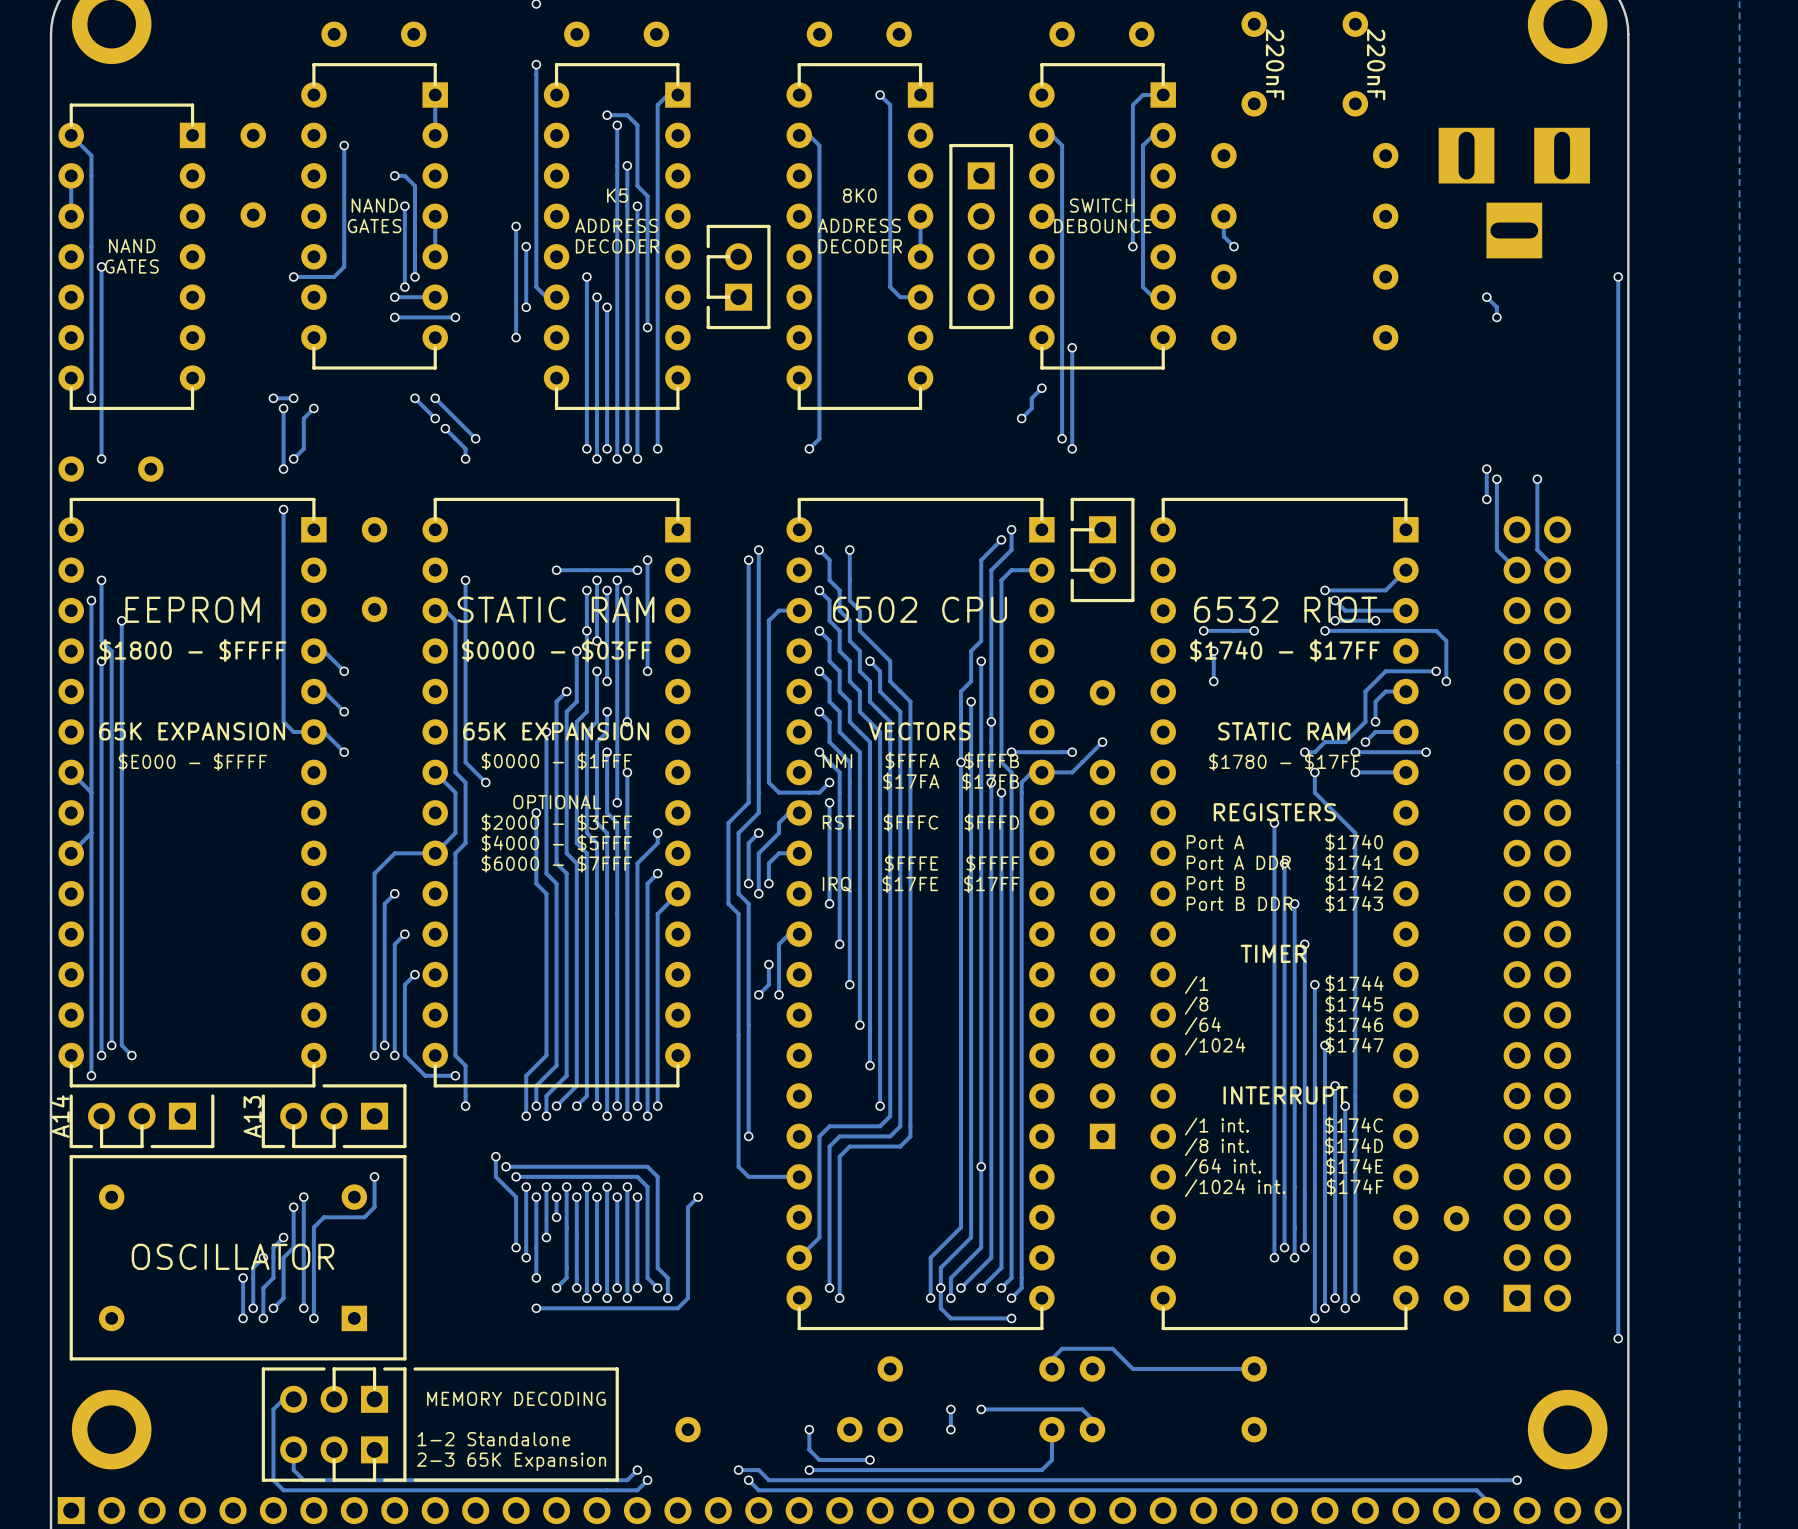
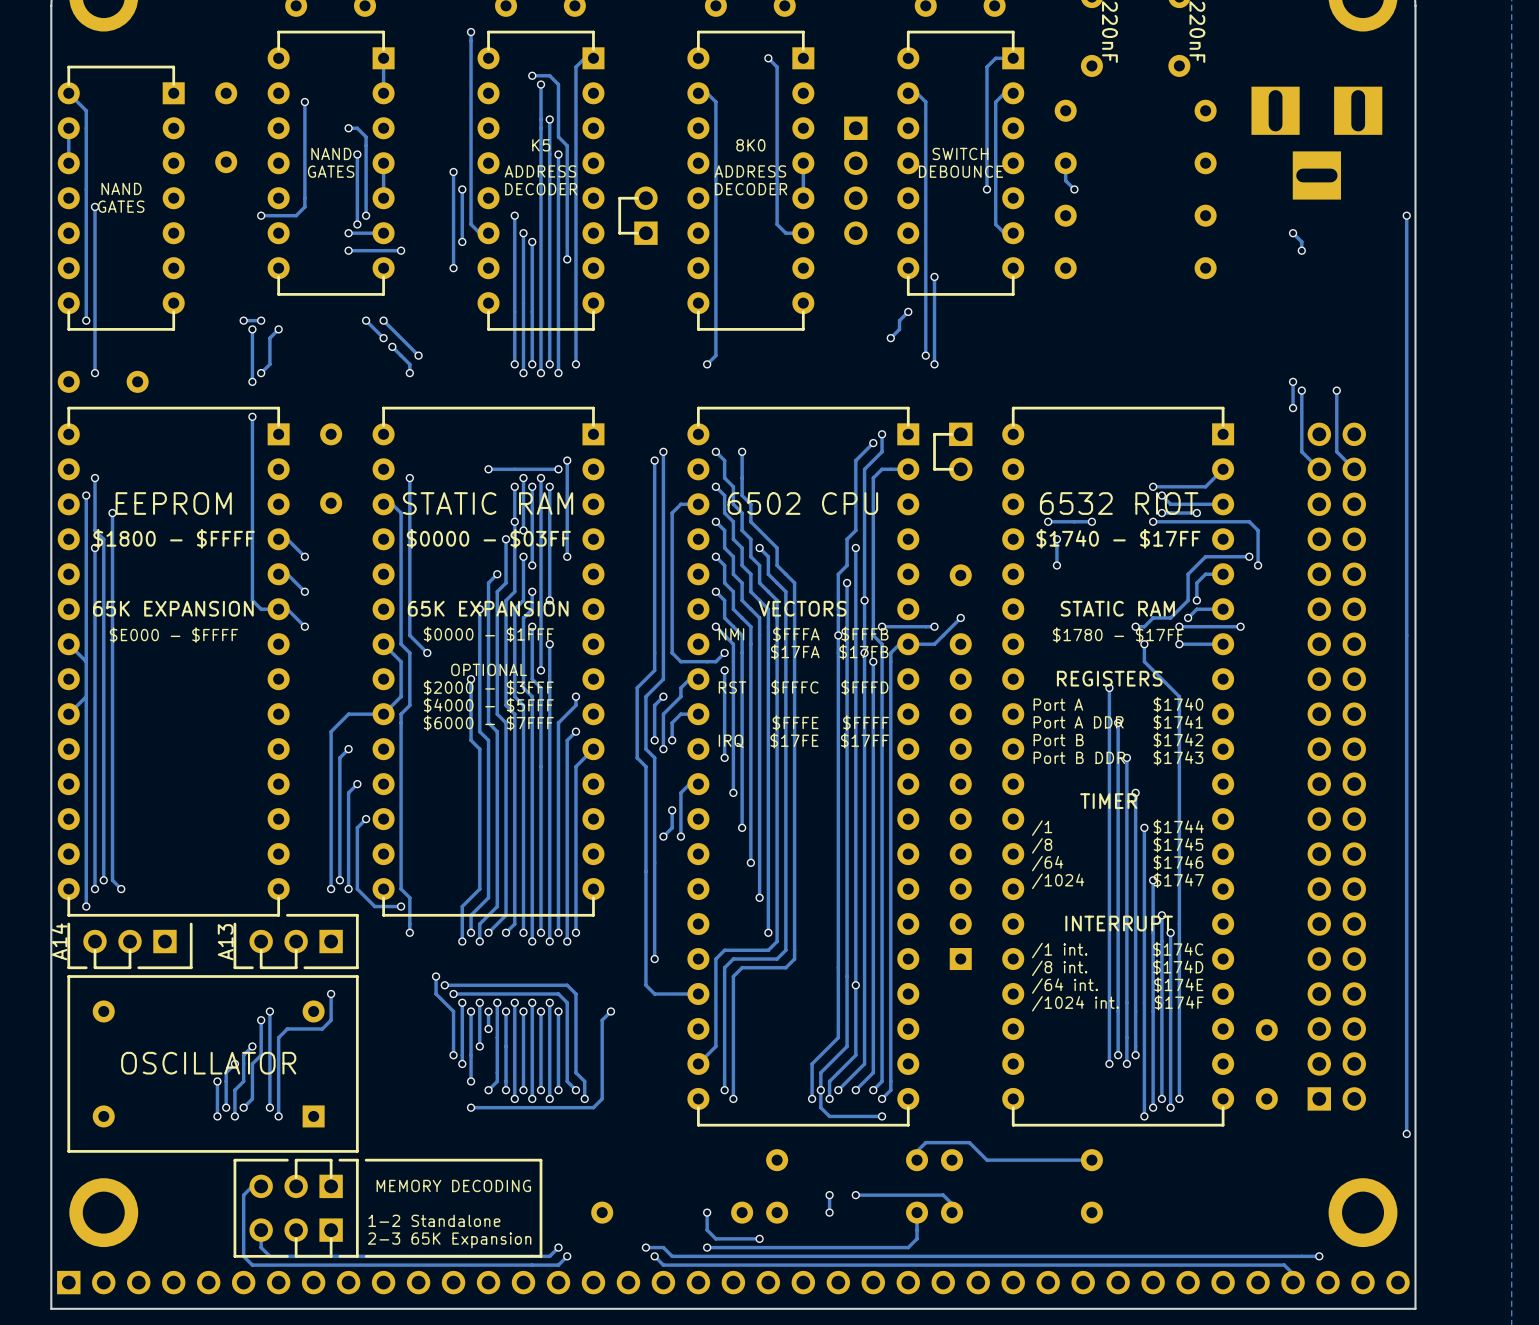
line: (1011, 145) (1011, 327) (950, 327) (950, 145) (1011, 145) -> none
line: (708, 246) (708, 226) (768, 226) (768, 327) (708, 327) (708, 307) -> none
line: (1072, 519) (1072, 499) (1132, 499) (1132, 600) (1072, 600) (1072, 580) -> none

